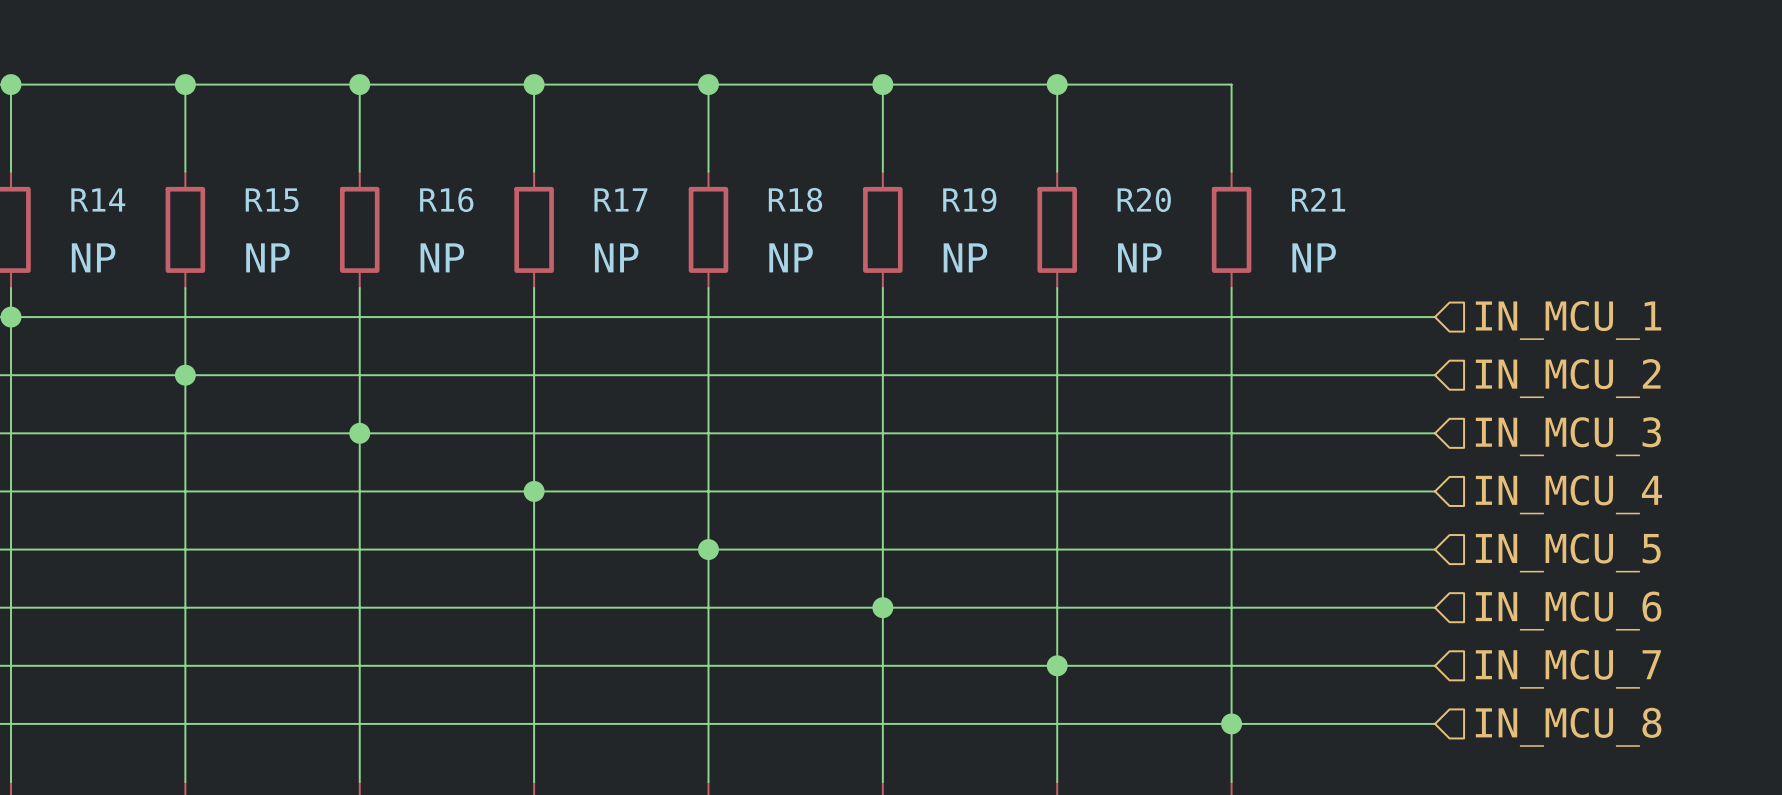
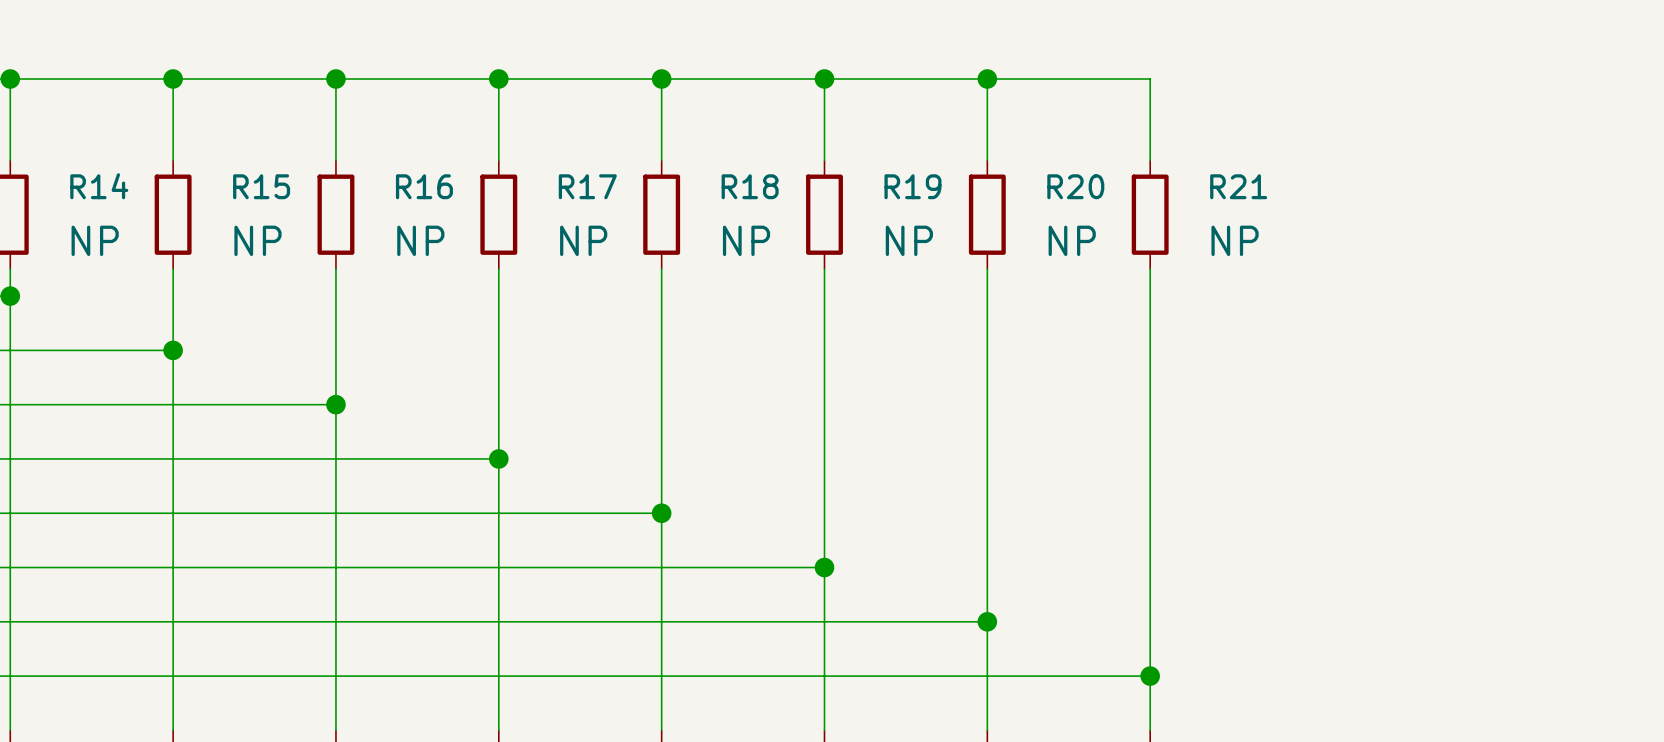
wire: (11, 317) (1435, 317) -> none
hierarchical label: IN_MCU_1 (1568, 320) -> none
wire: (185, 375) (1435, 375) -> none
hierarchical label: IN_MCU_2 (1568, 378) -> none
wire: (359, 433) (1435, 433) -> none
hierarchical label: IN_MCU_3 (1568, 436) -> none
wire: (534, 491) (1435, 491) -> none
hierarchical label: IN_MCU_4 (1568, 494) -> none
wire: (708, 549) (1435, 549) -> none
hierarchical label: IN_MCU_5 (1568, 552) -> none
wire: (882, 607) (1435, 607) -> none
hierarchical label: IN_MCU_6 (1568, 611) -> none
wire: (1057, 665) (1435, 665) -> none
hierarchical label: IN_MCU_7 (1568, 669) -> none
wire: (1231, 723) (1435, 723) -> none
hierarchical label: IN_MCU_8 (1568, 727) -> none

